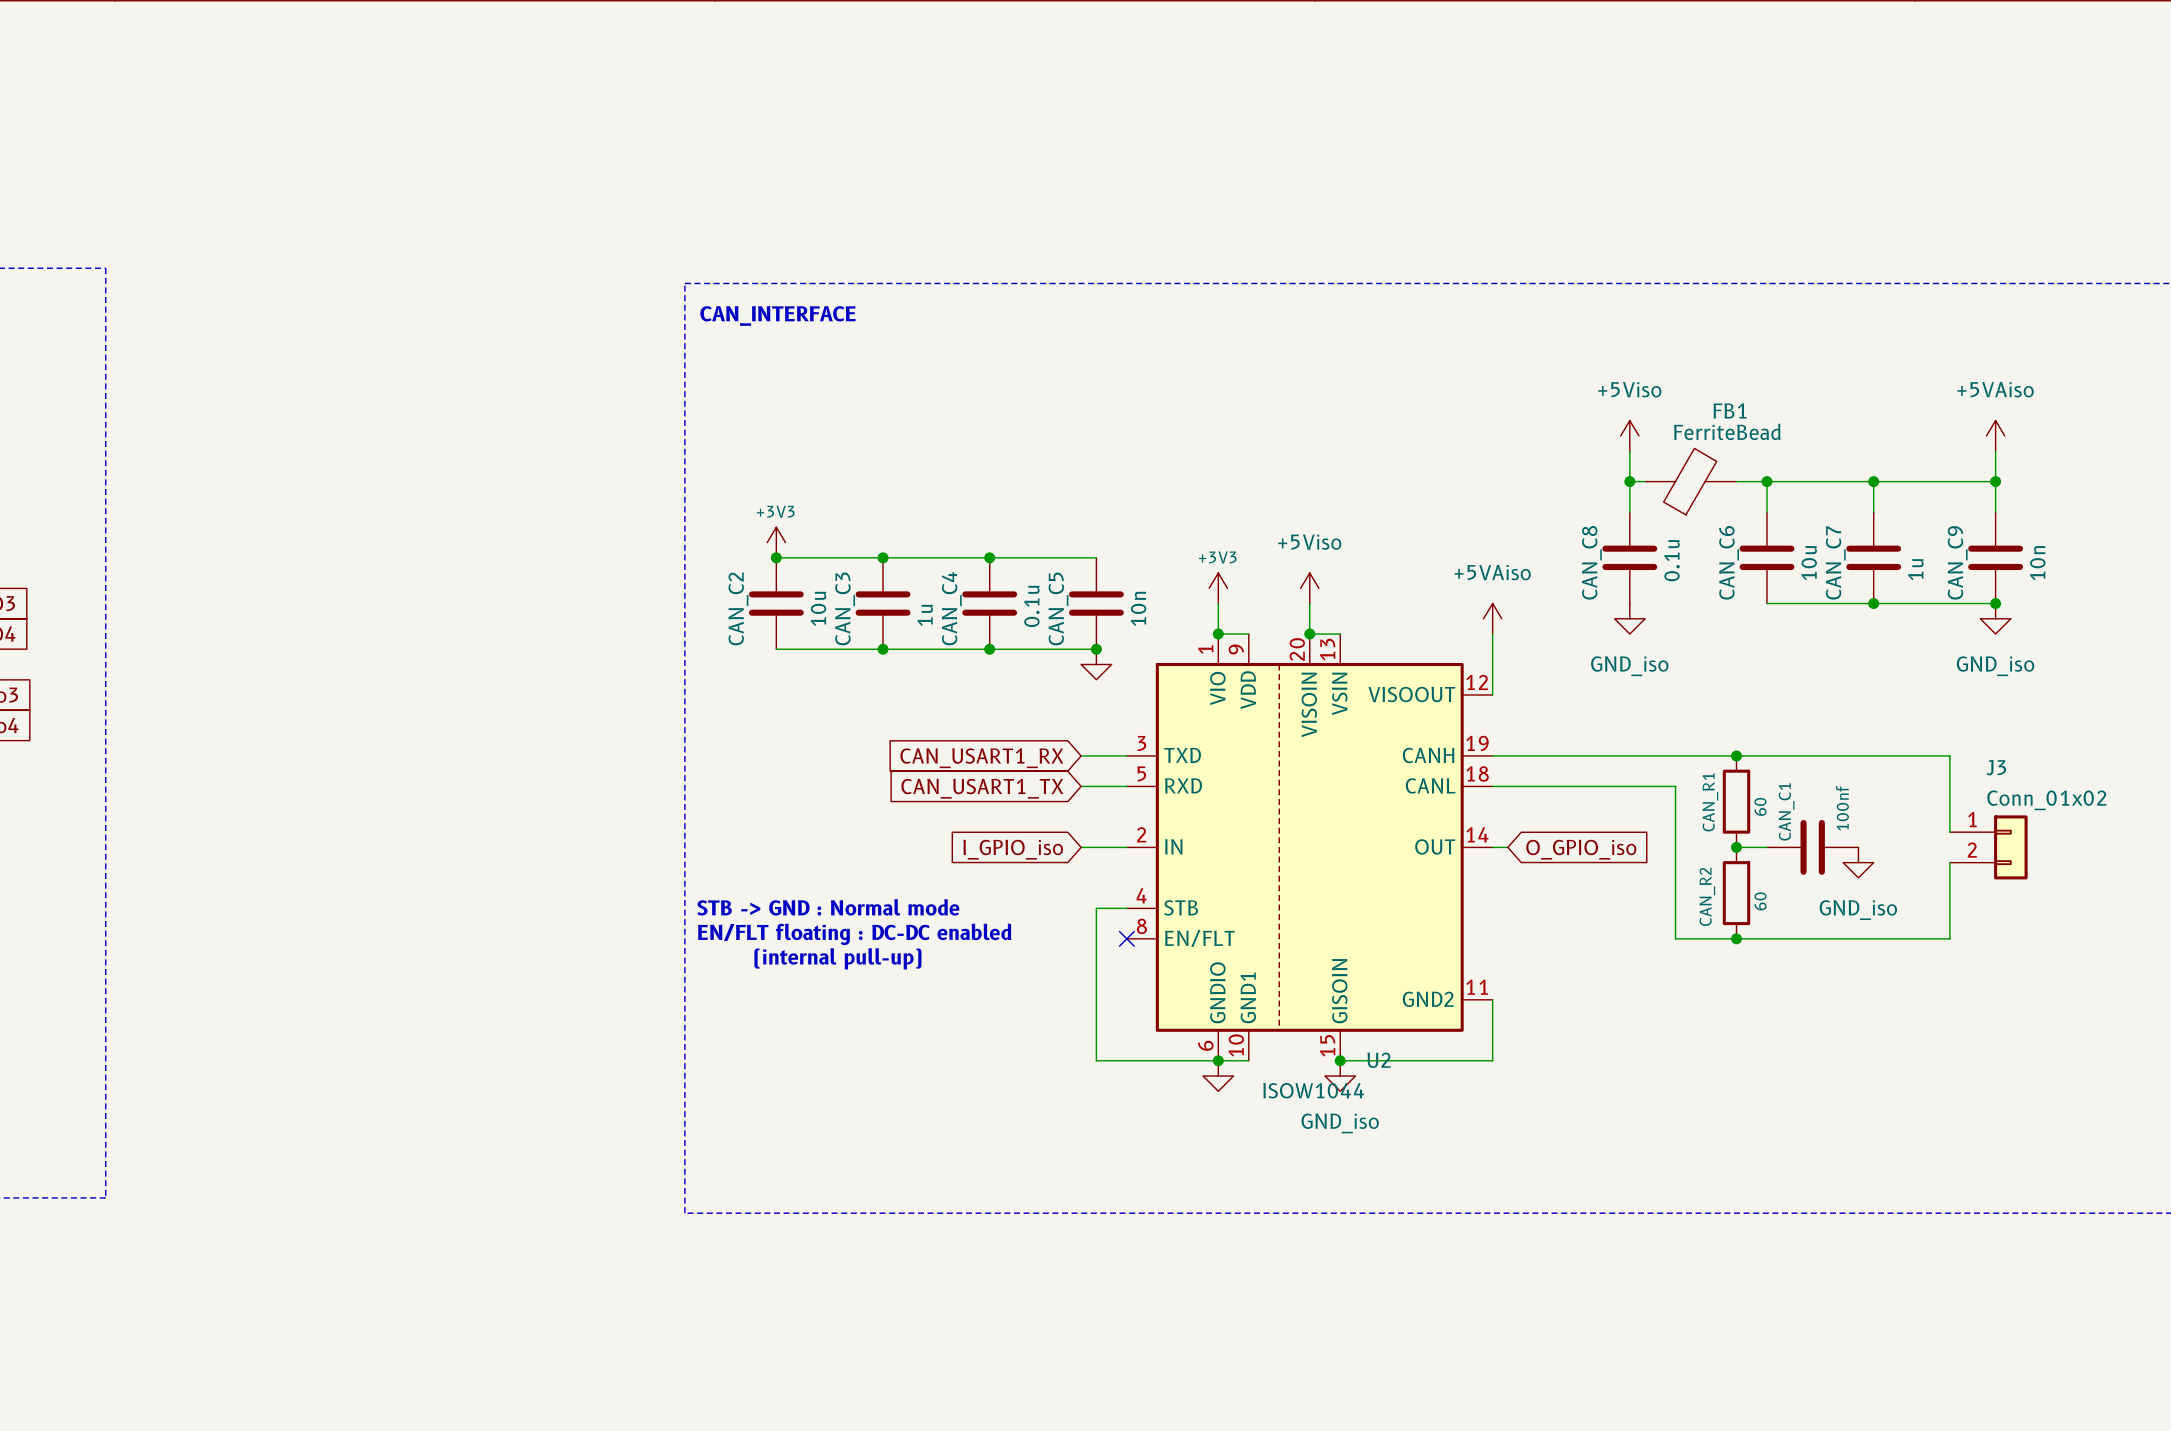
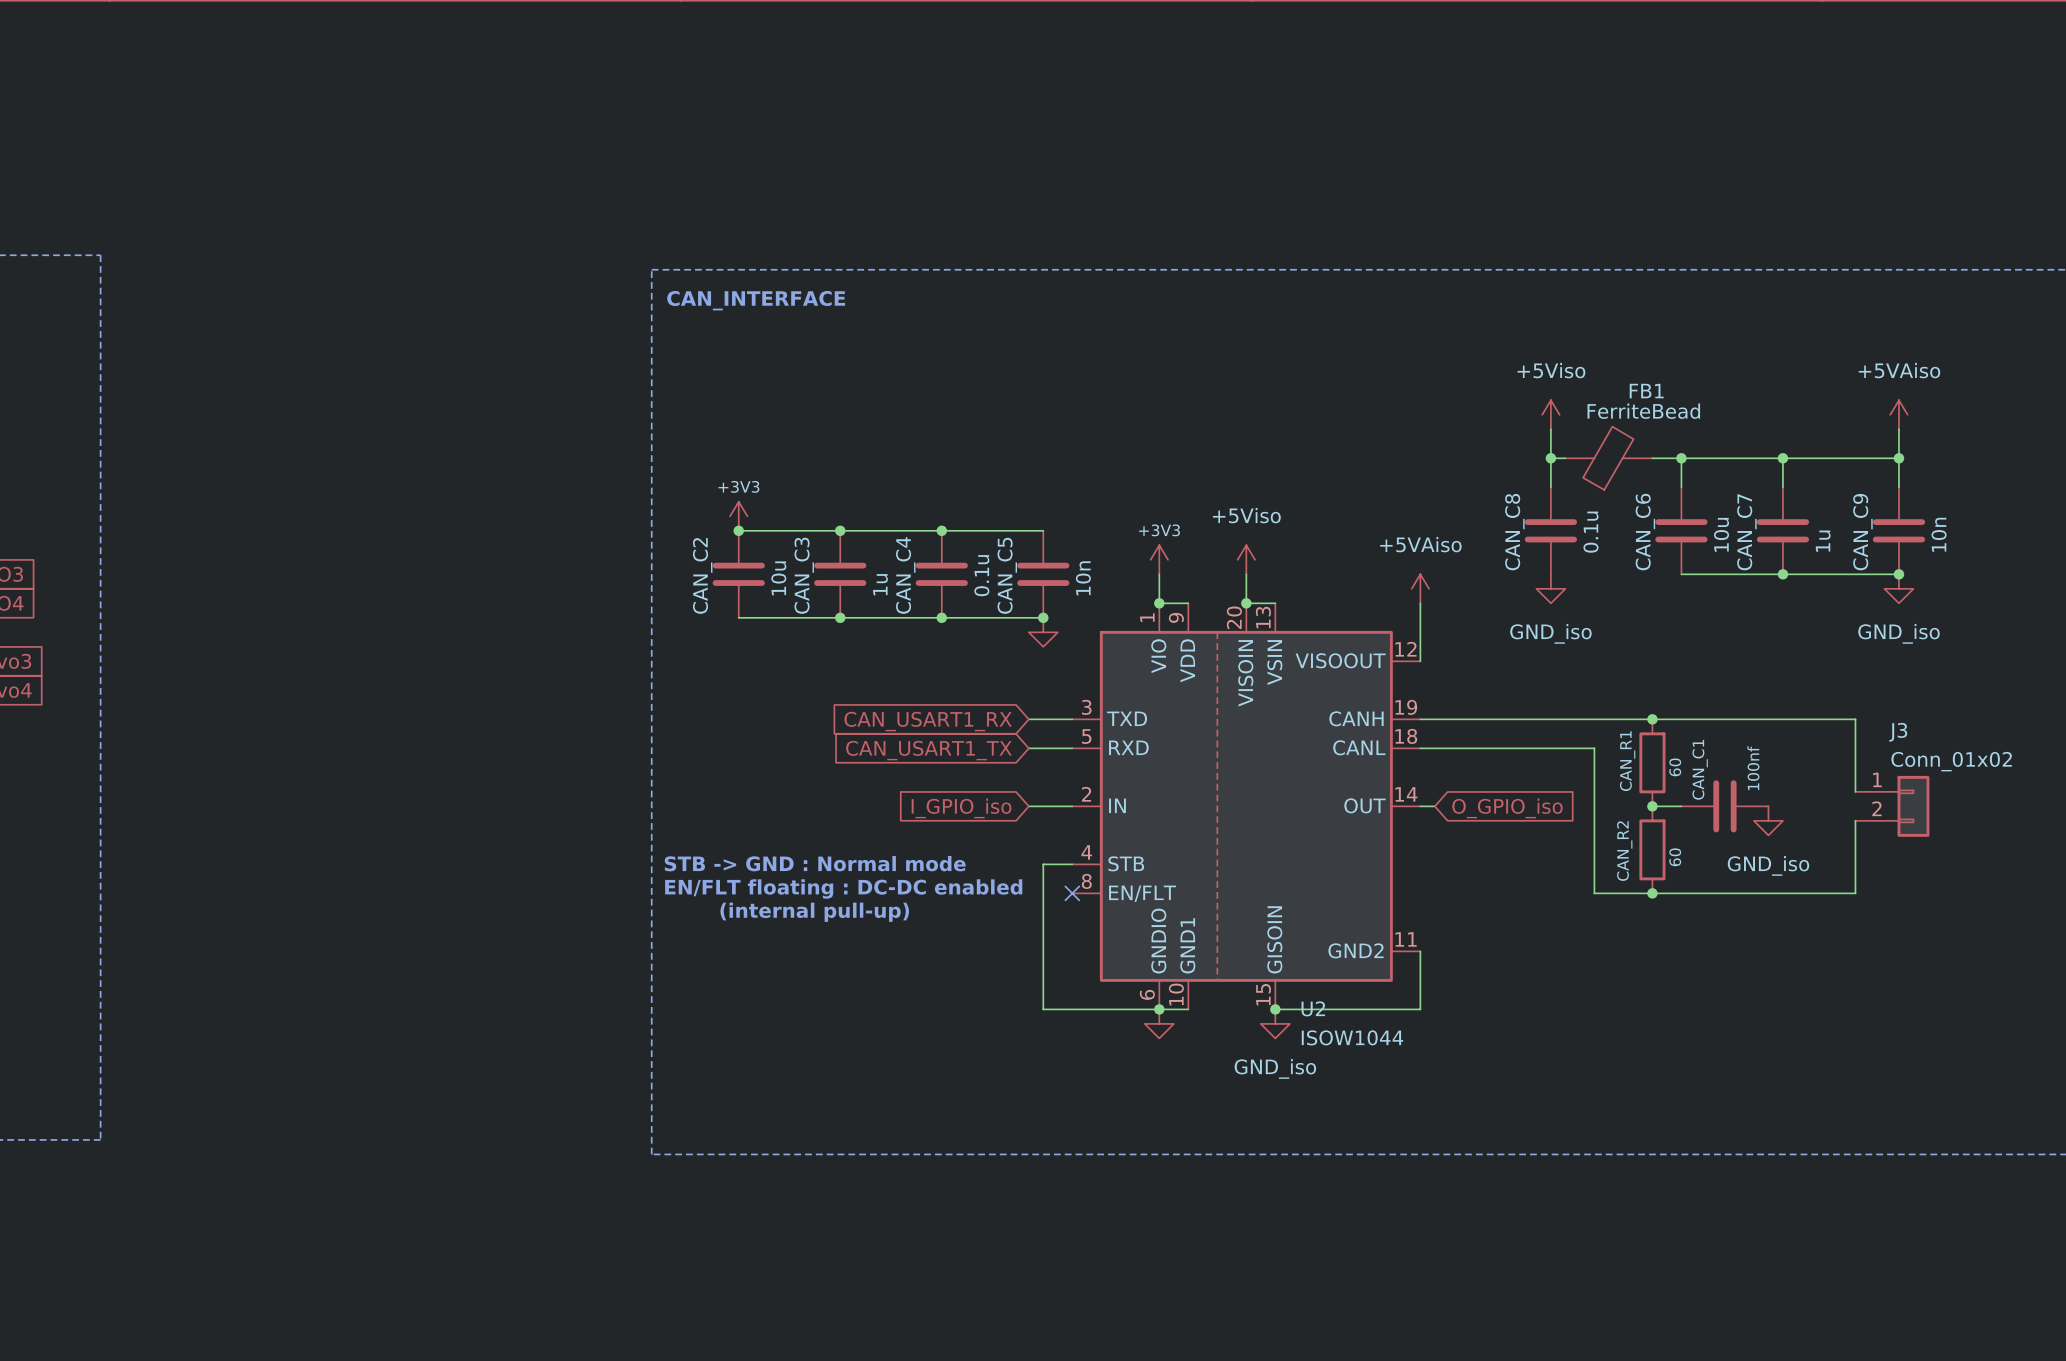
U2 value position: ISOW1044 (1313, 1090) -> ISOW1044 (1352, 1037)

